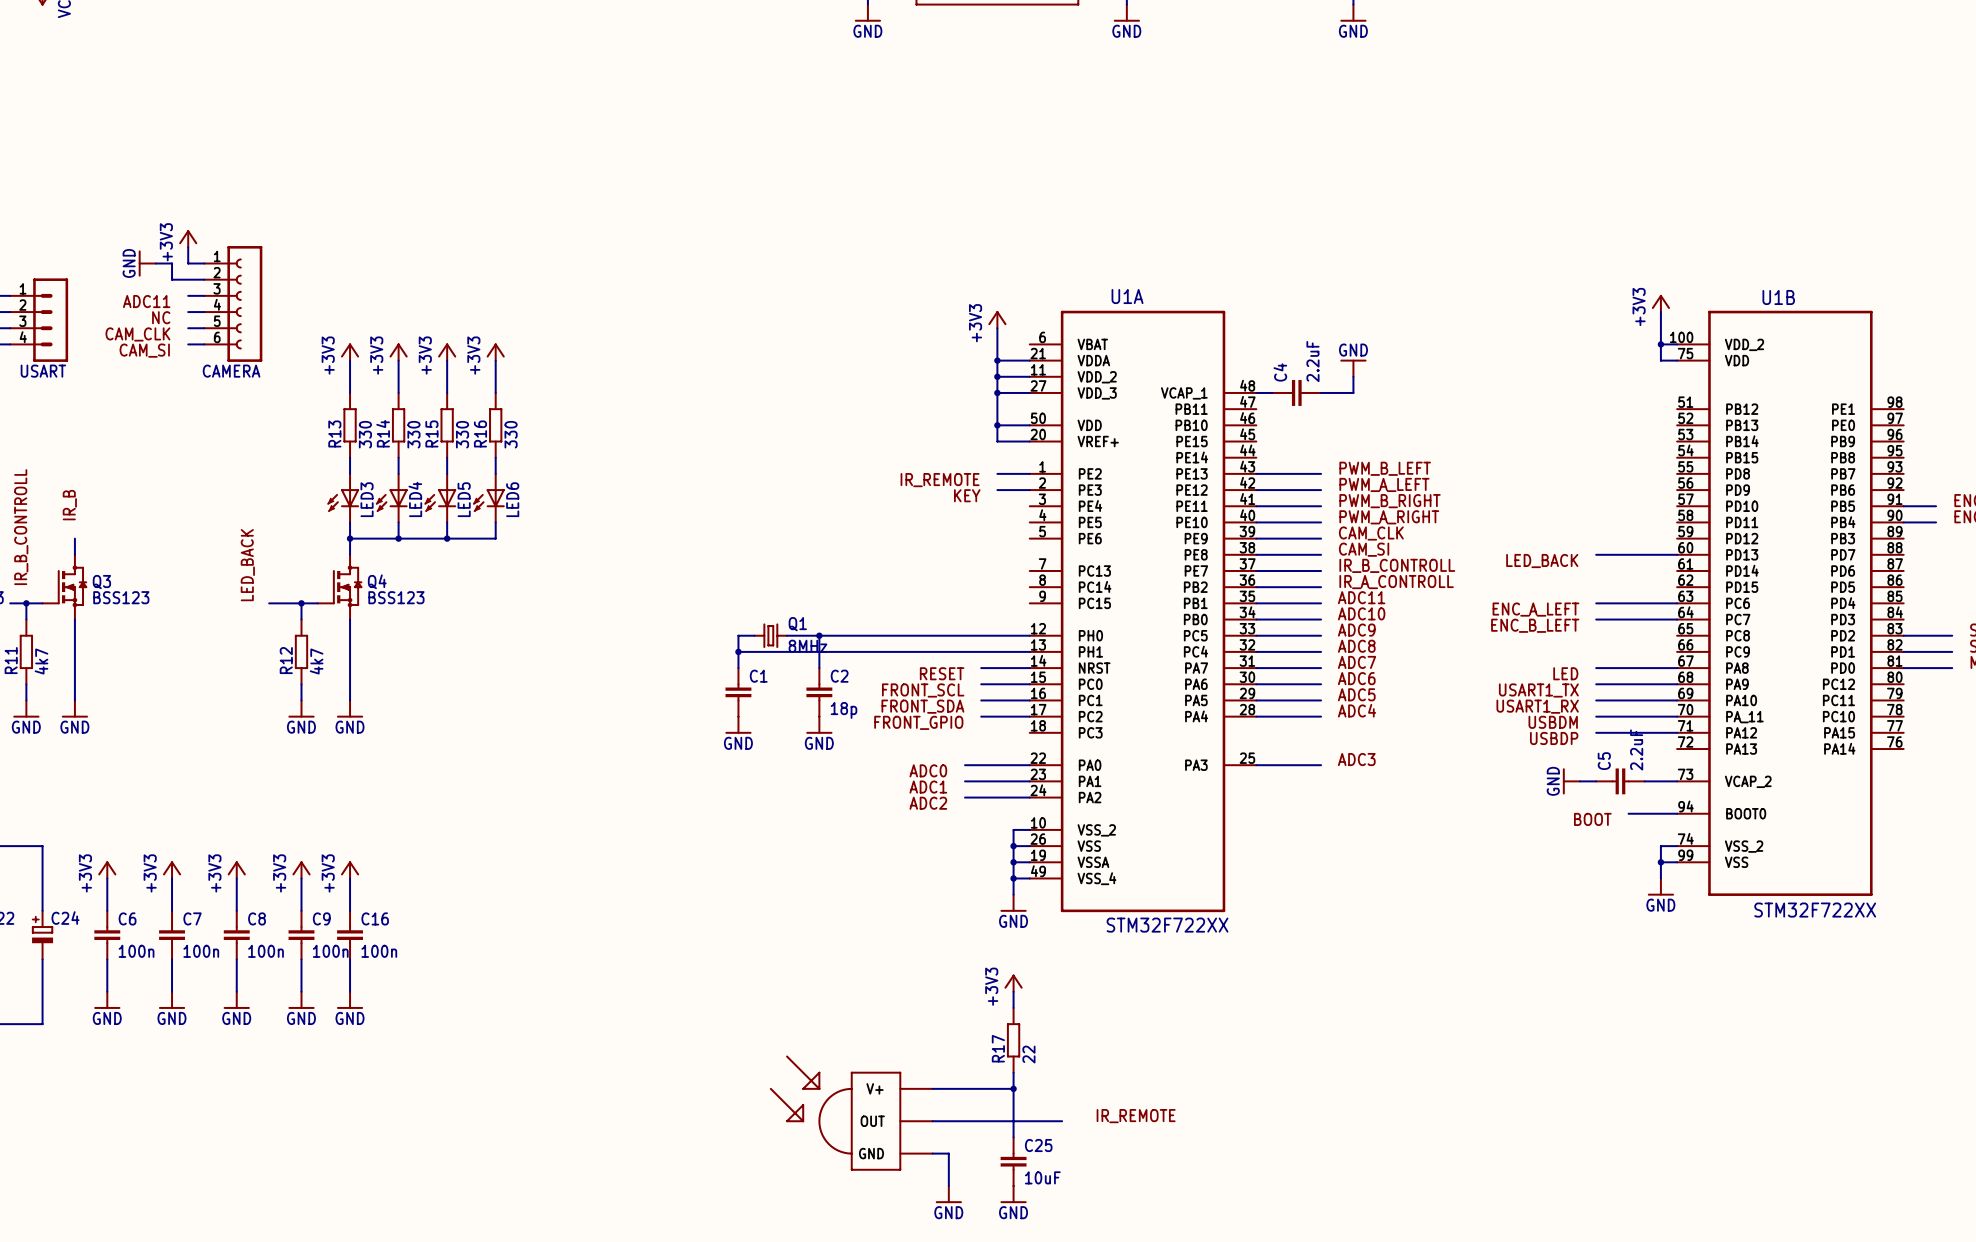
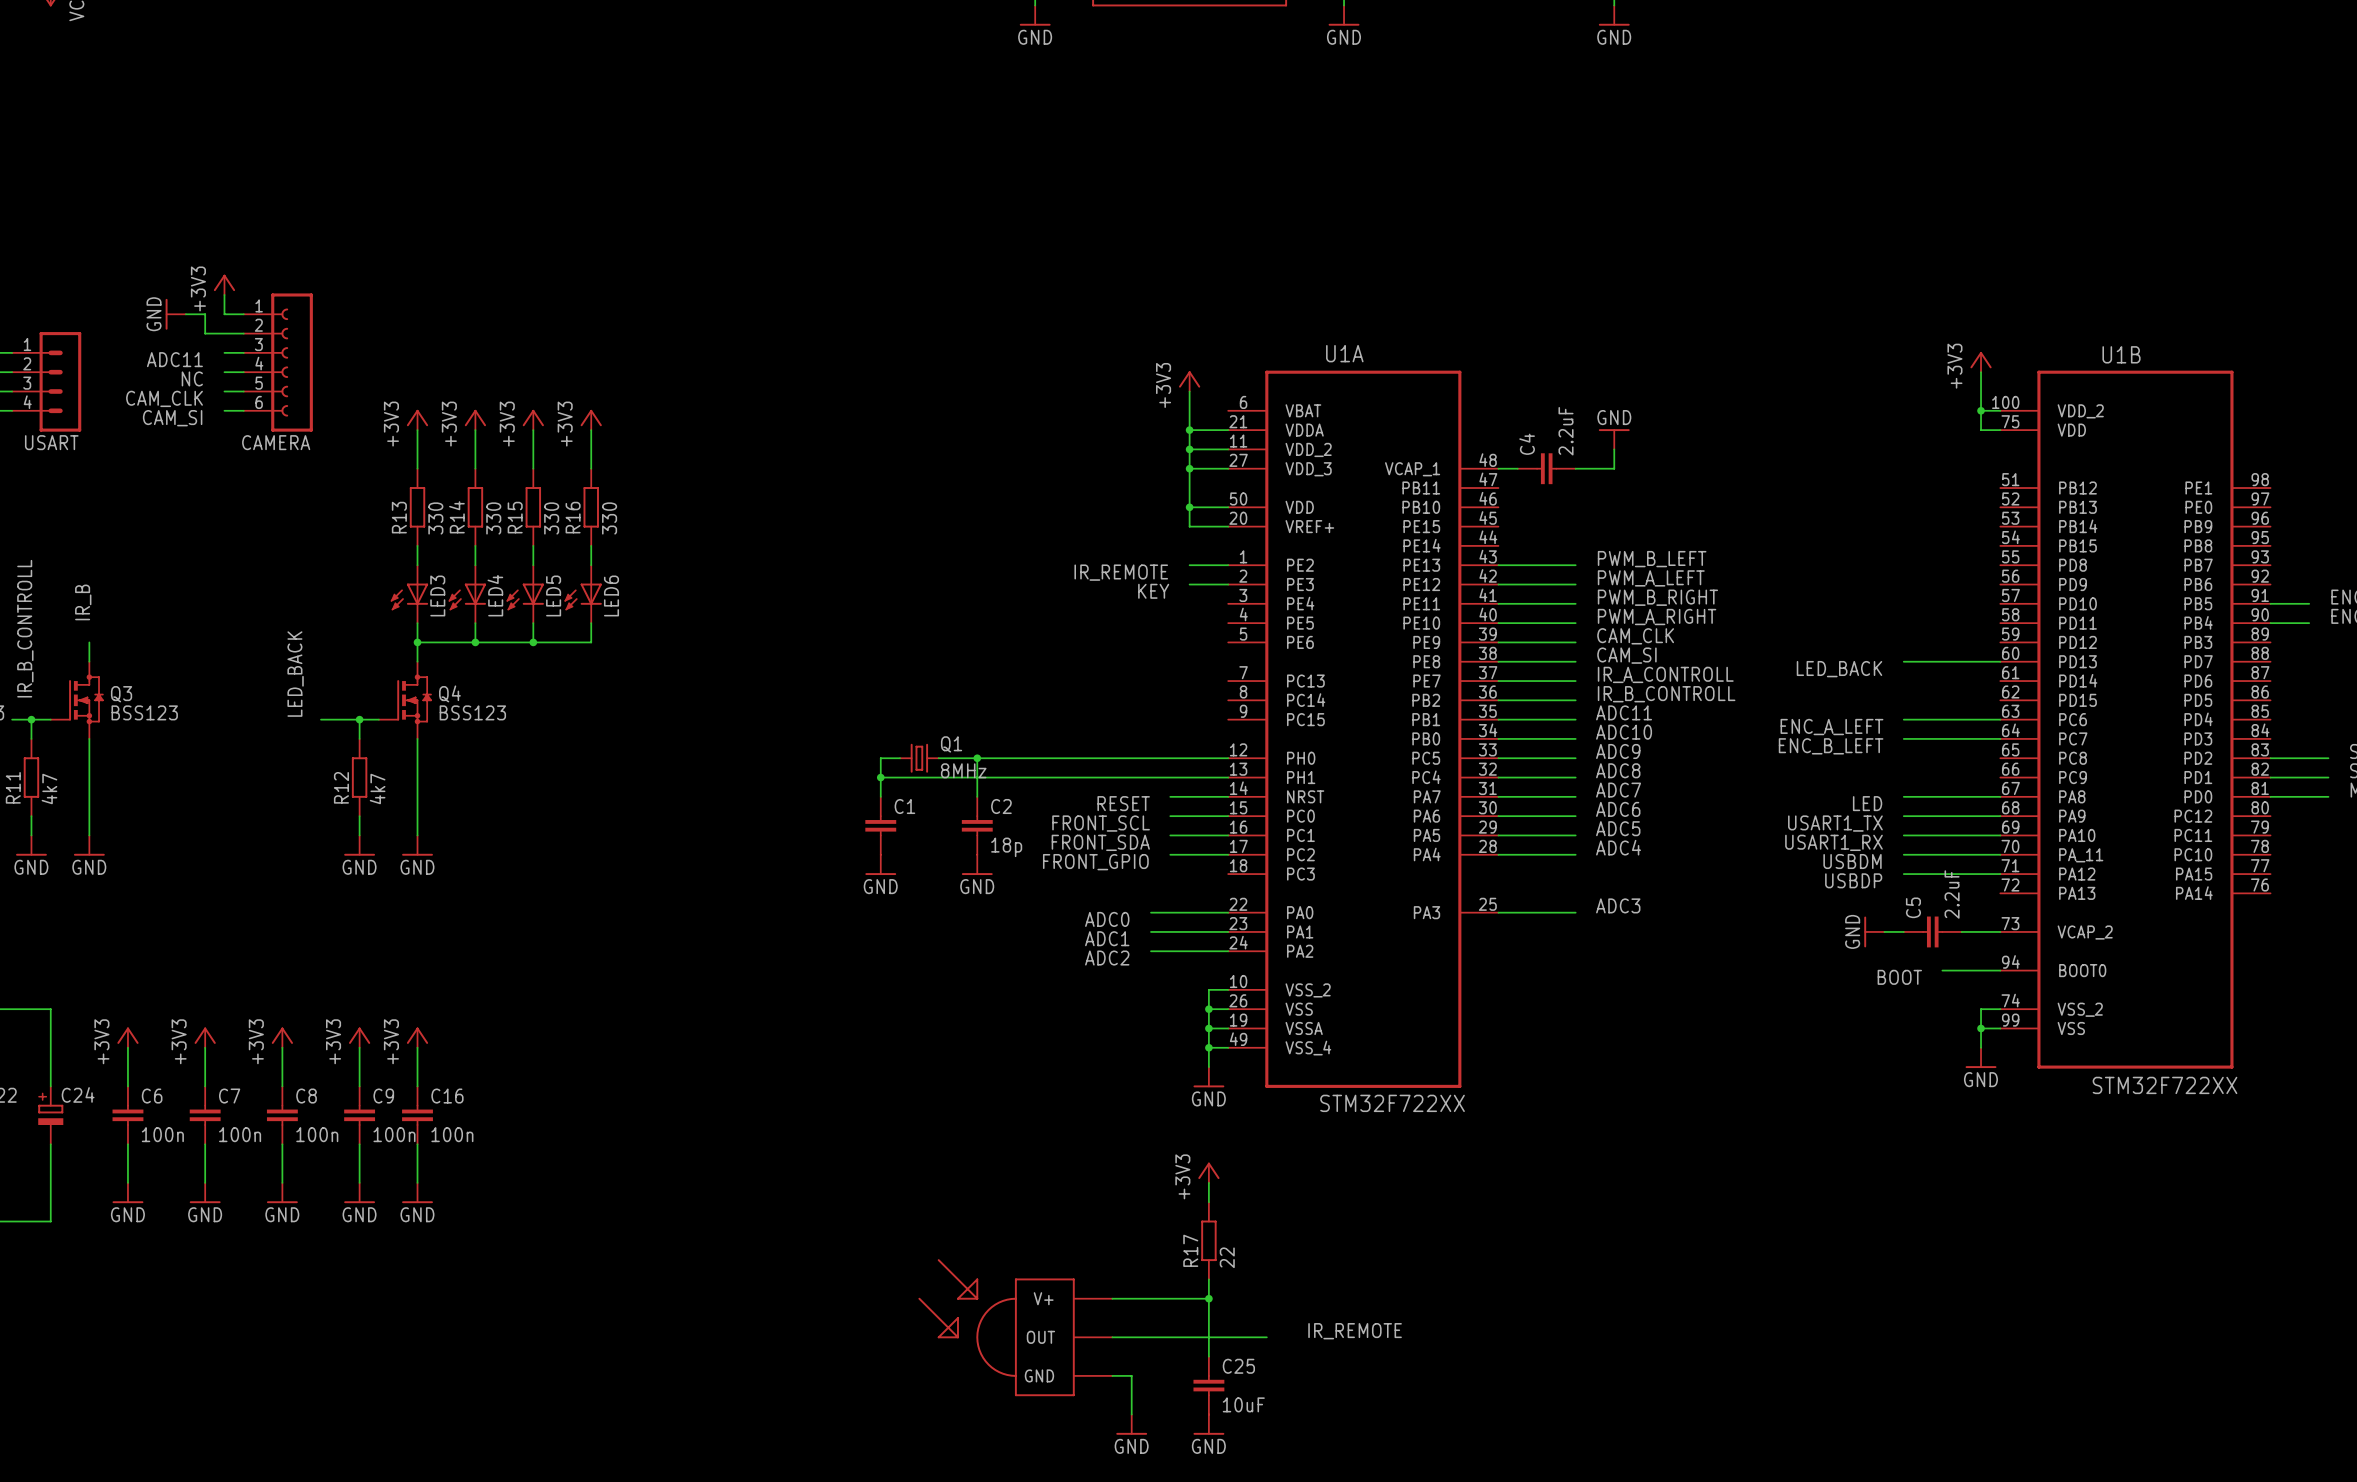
label: IR_B_CONTROLL (1397, 565) -> IR_A_CONTROLL (1665, 674)
label: IR_A_CONTROLL (1396, 582) -> IR_B_CONTROLL (1666, 694)

